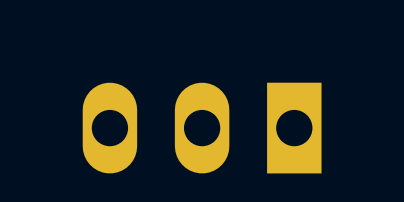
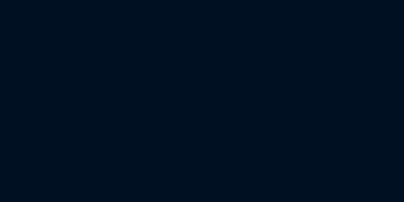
part: (202, 128) -> none

